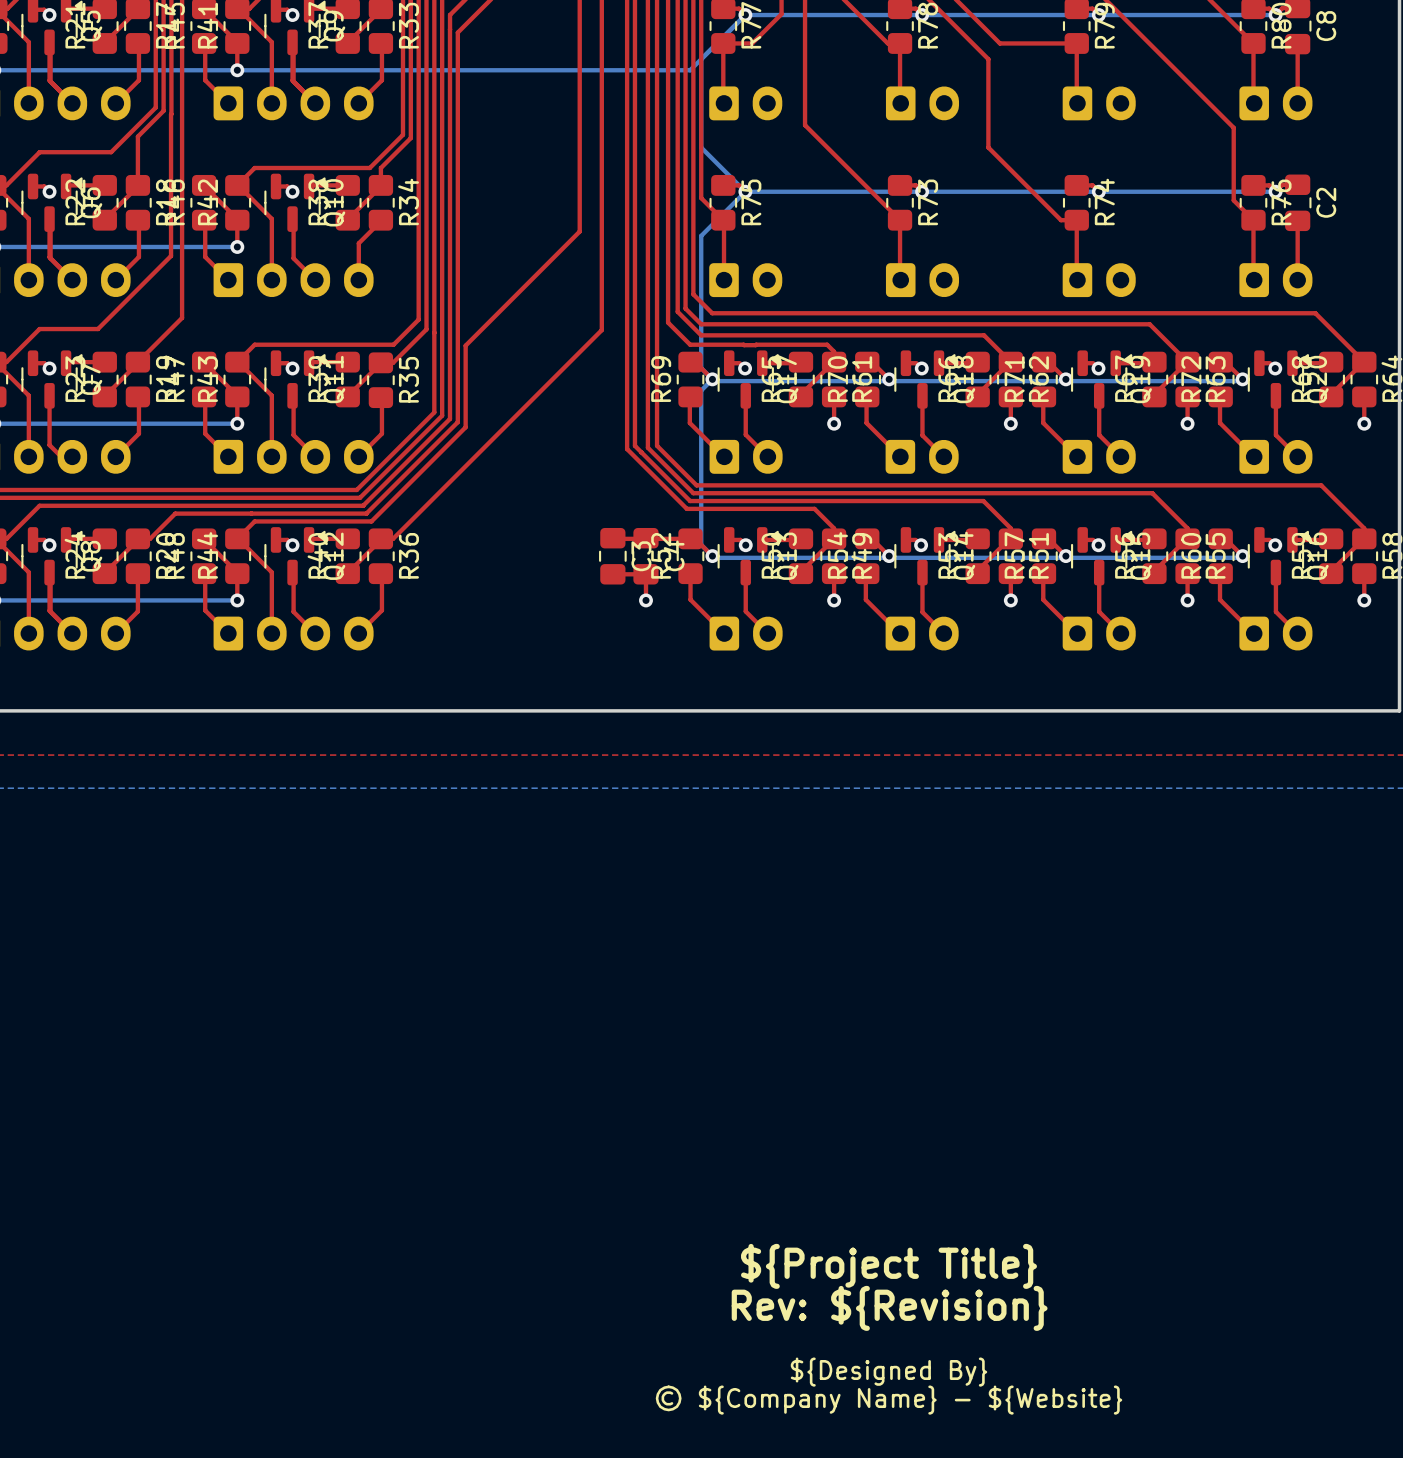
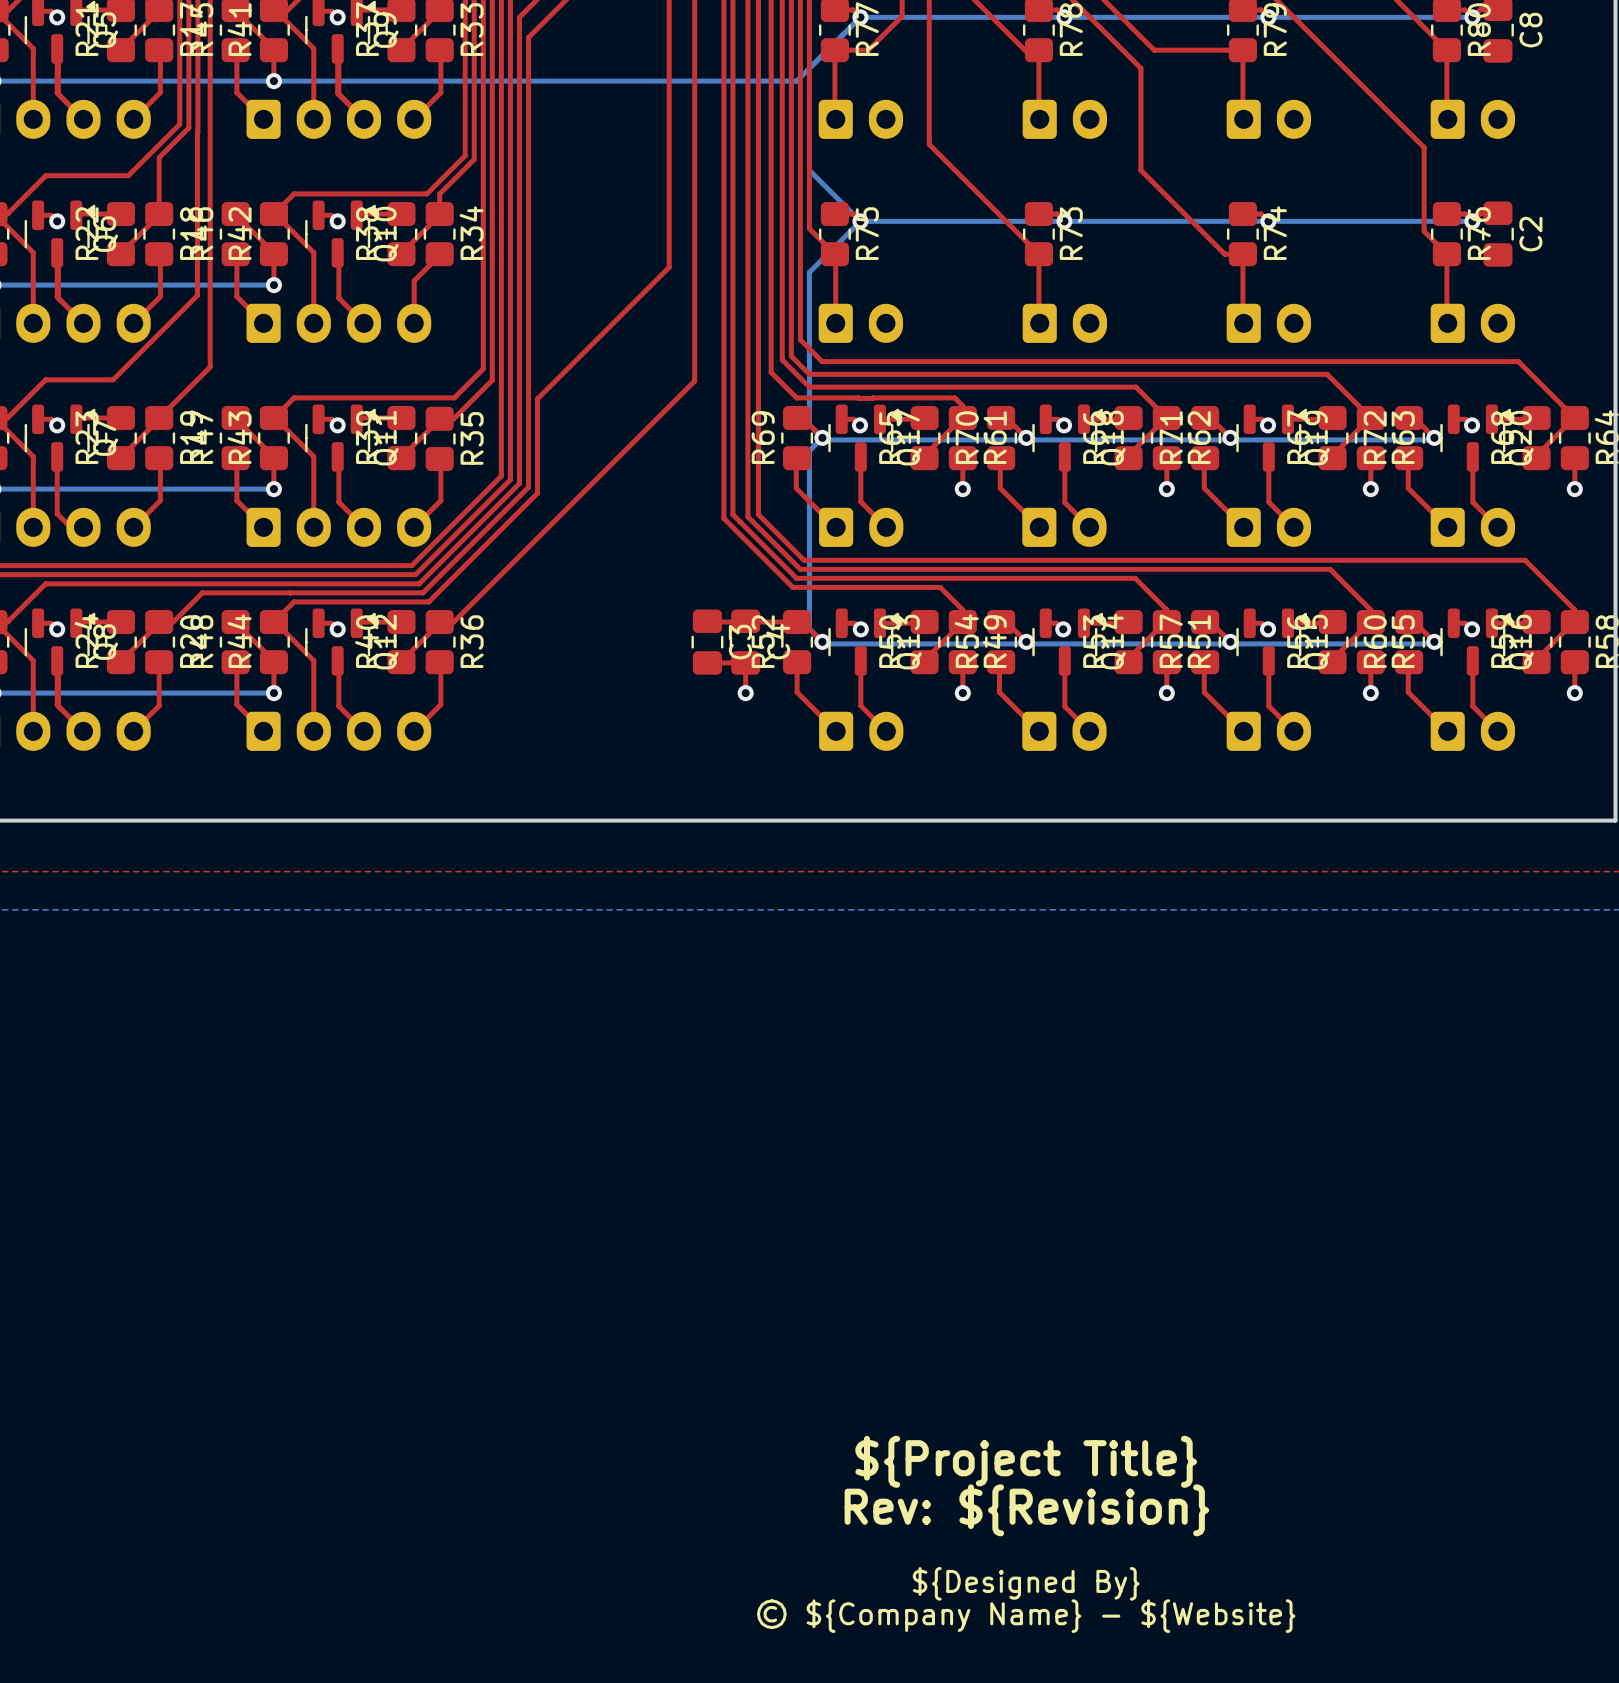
top track: (1297, 44) (1297, 103) -> none
top track: (1297, 220) (1297, 280) -> none

